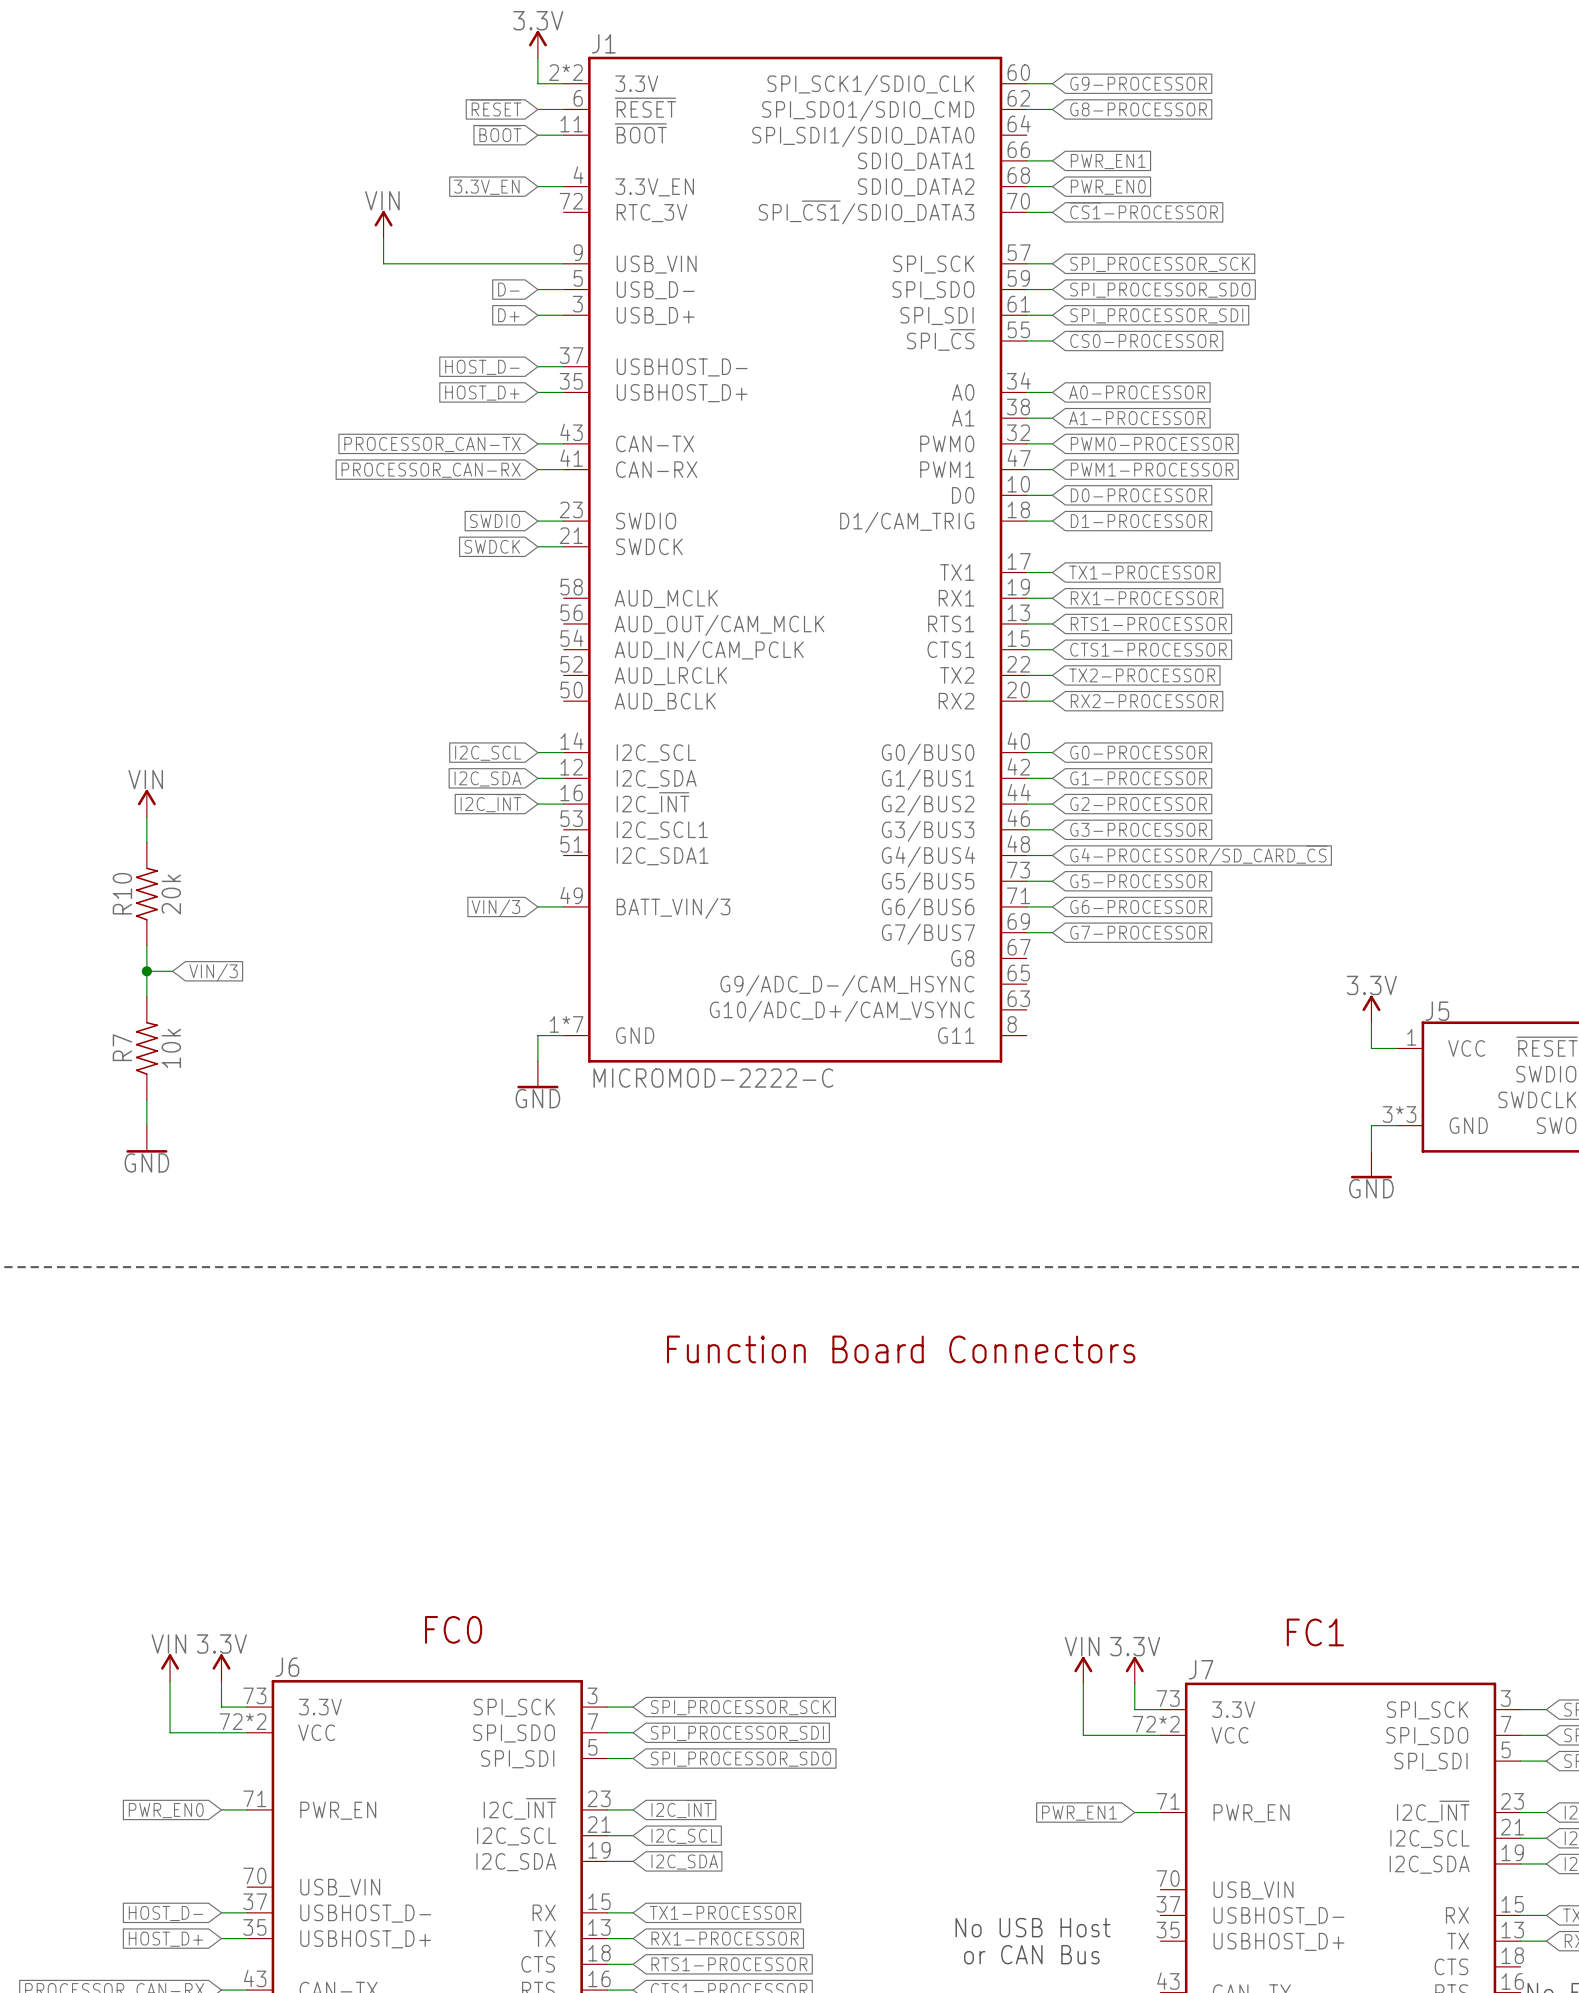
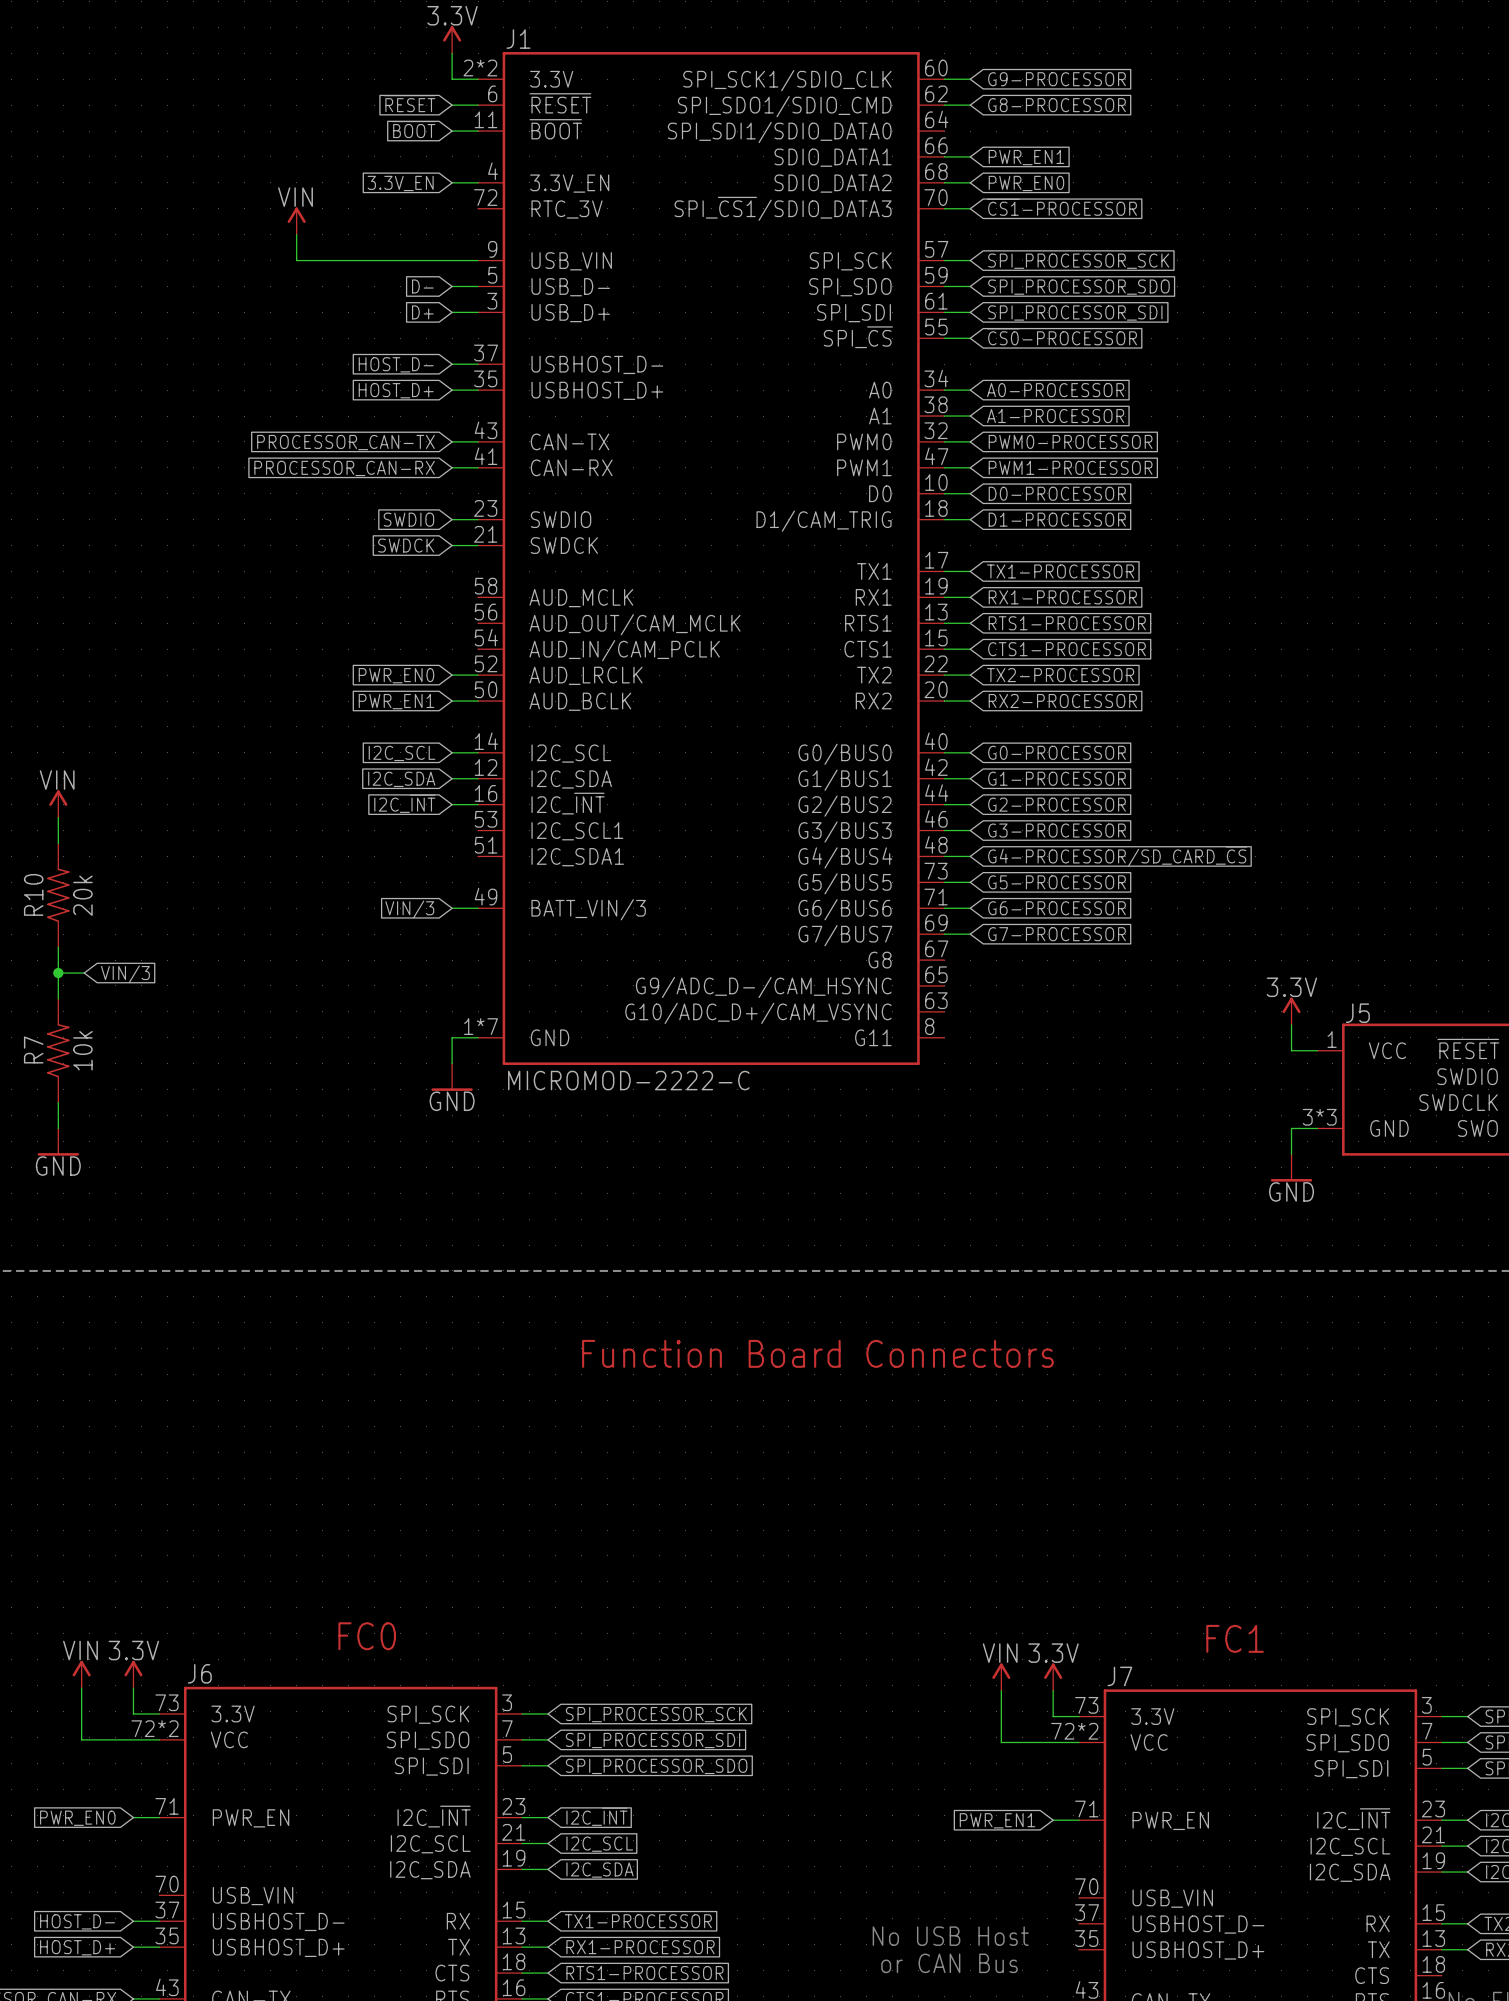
wire: none -> (452, 675) (478, 675)
global label: none -> PWR_EN0 (396, 675)
global label: none -> PWR_EN1 (396, 701)
wire: none -> (452, 701) (478, 701)

